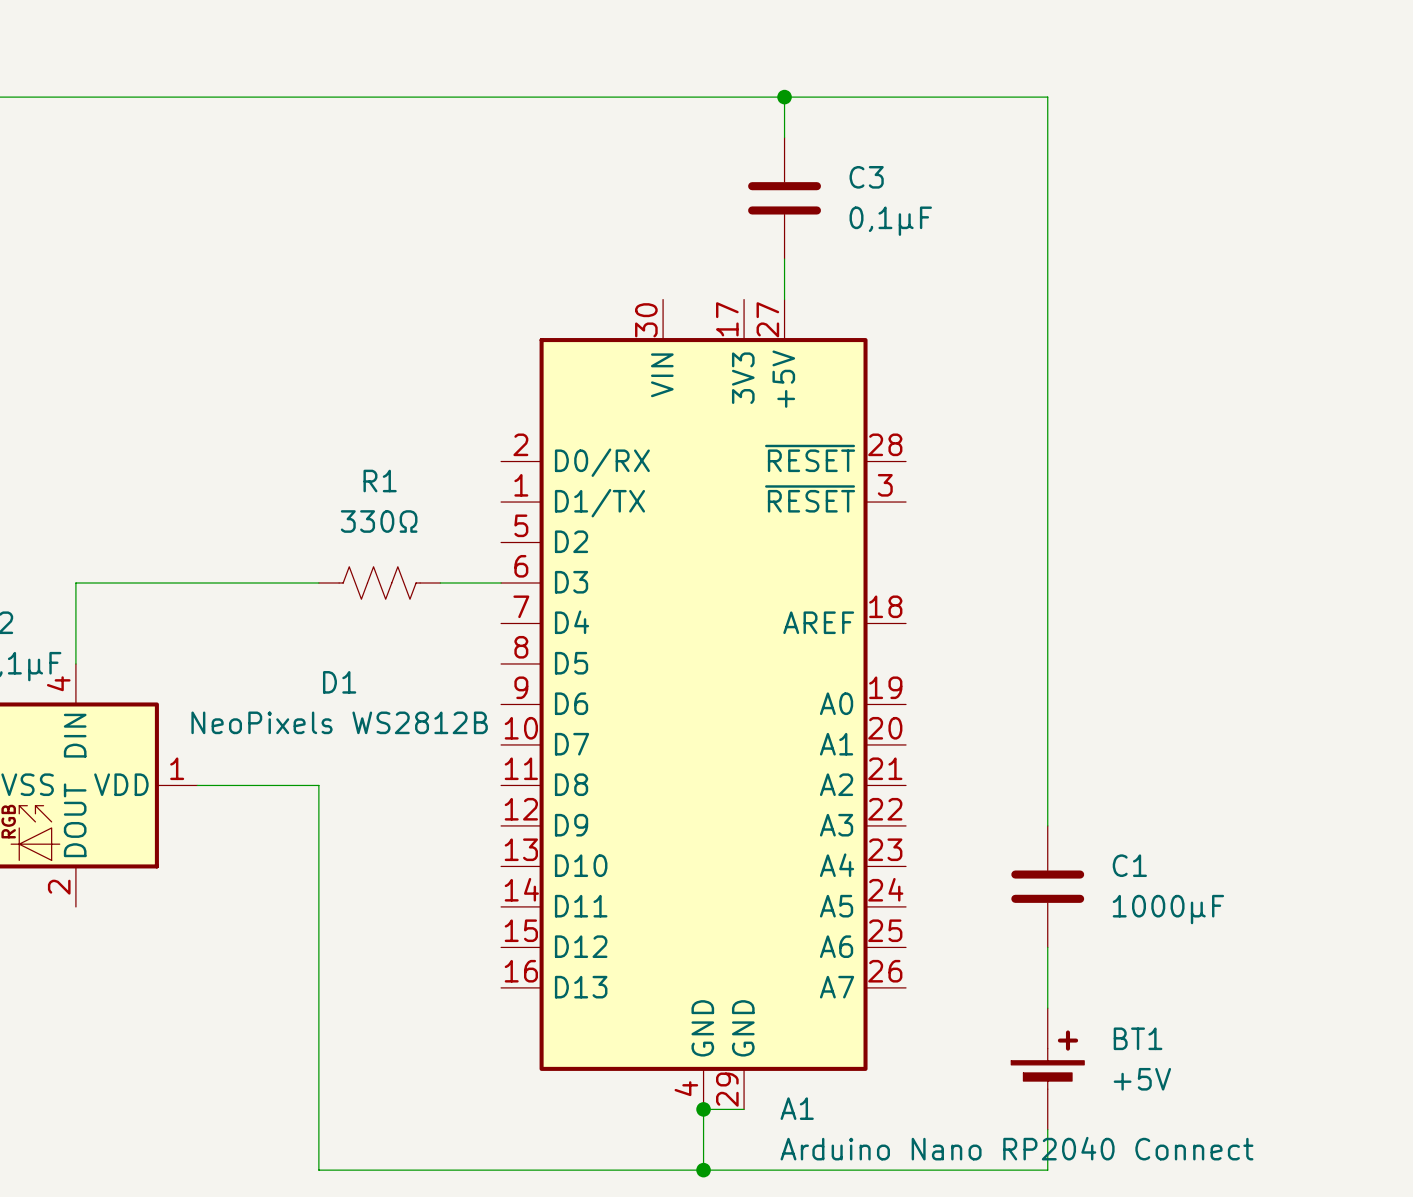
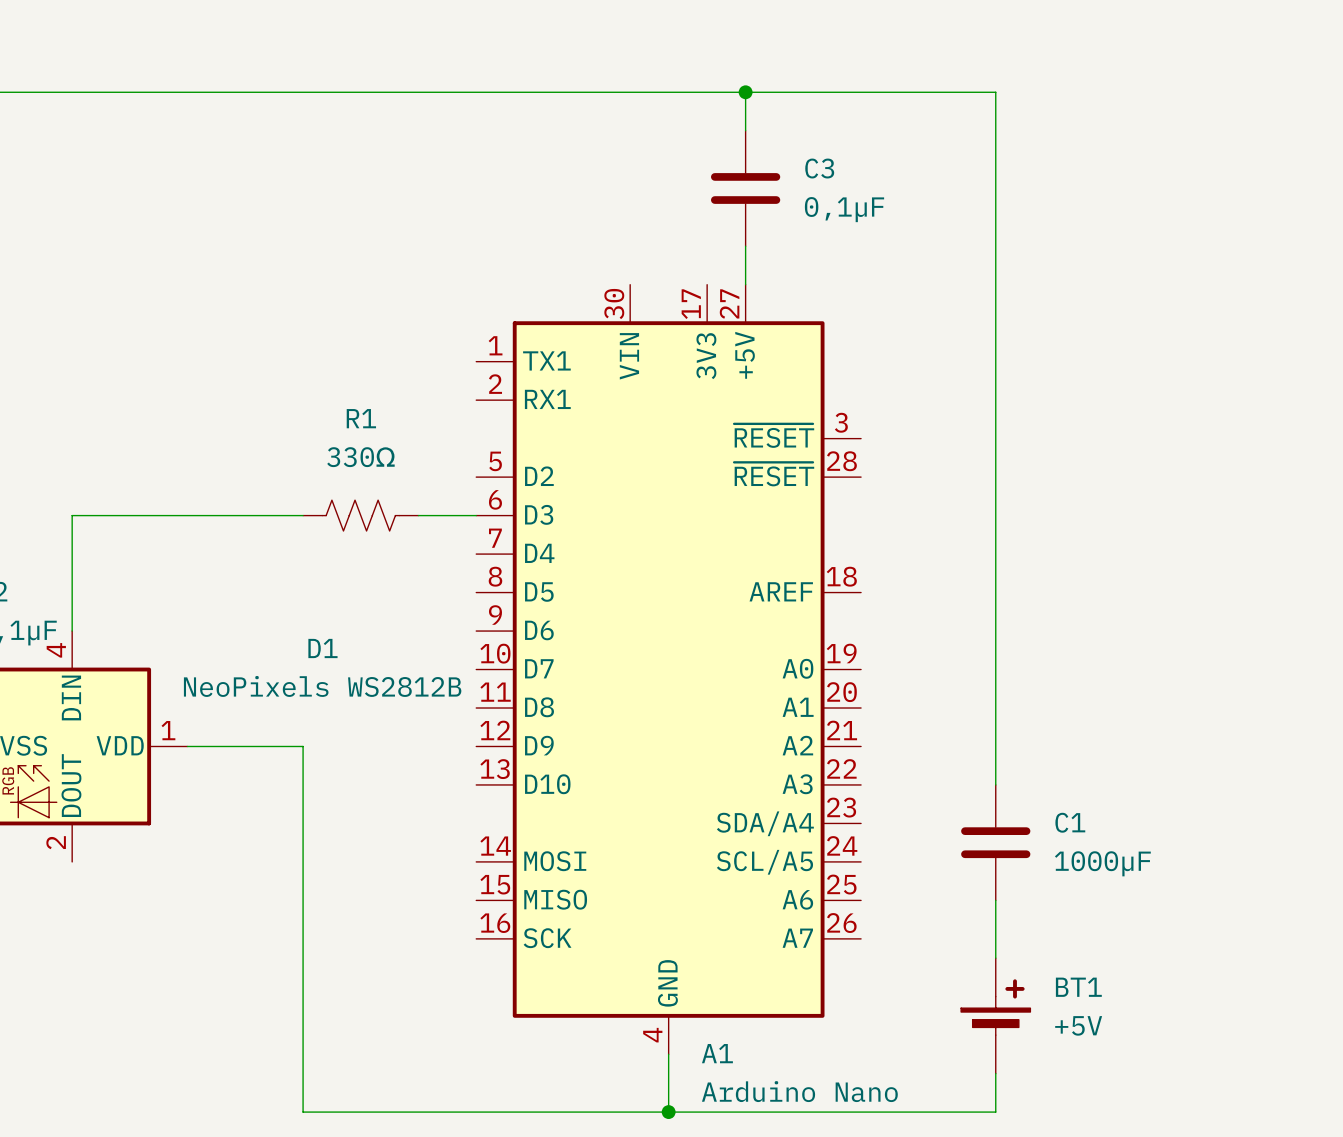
A1 symbol: [501, 299, 907, 1110] -> [476, 284, 862, 1055]
wire: (75, 583) (318, 583) -> (72, 554) (72, 515) (303, 515)
R1 position: (379, 583) -> (360, 515)
wire: (440, 583) (501, 583) -> (418, 515) (476, 515)
A1 name position: A1 (797, 1108) -> A1 (717, 1053)
wire: (703, 1109) (744, 1109) -> none
junction: (703, 1109) -> none
A1 value: Arduino Nano RP2040 Connect (1016, 1148) -> Arduino Nano (799, 1091)

